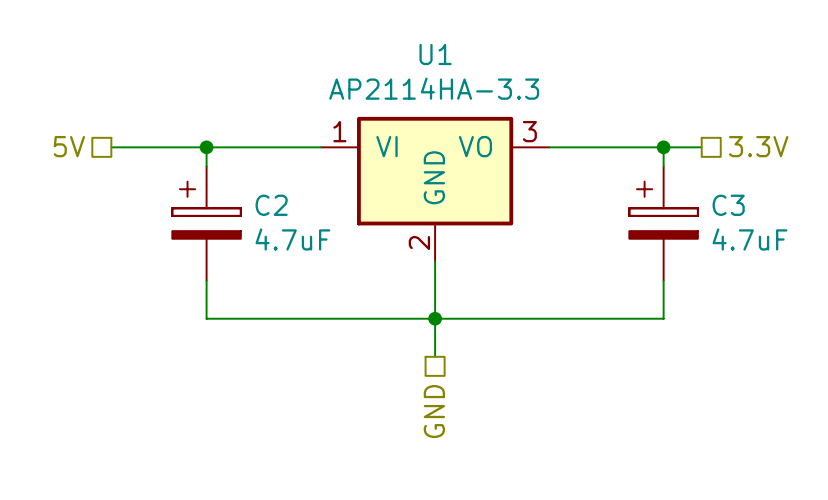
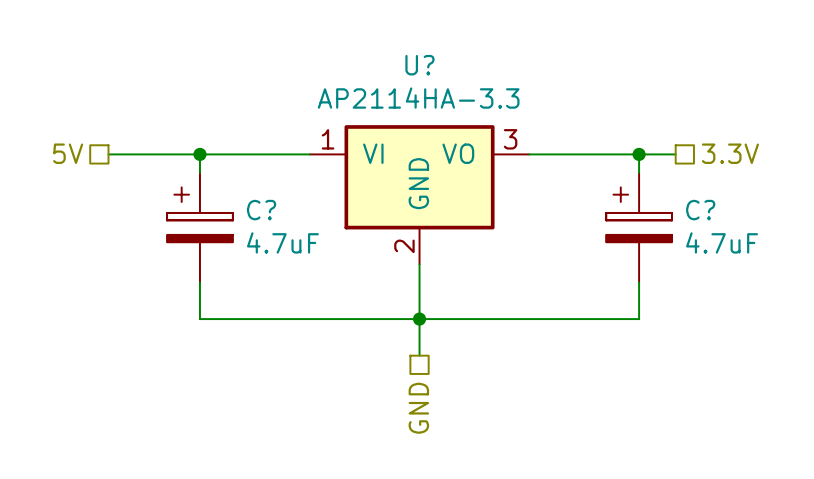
U1 name: U1 (435, 54) -> U? (419, 65)
C2 name: C2 (271, 205) -> C? (261, 210)
C3 name: C3 (728, 205) -> C? (700, 210)

